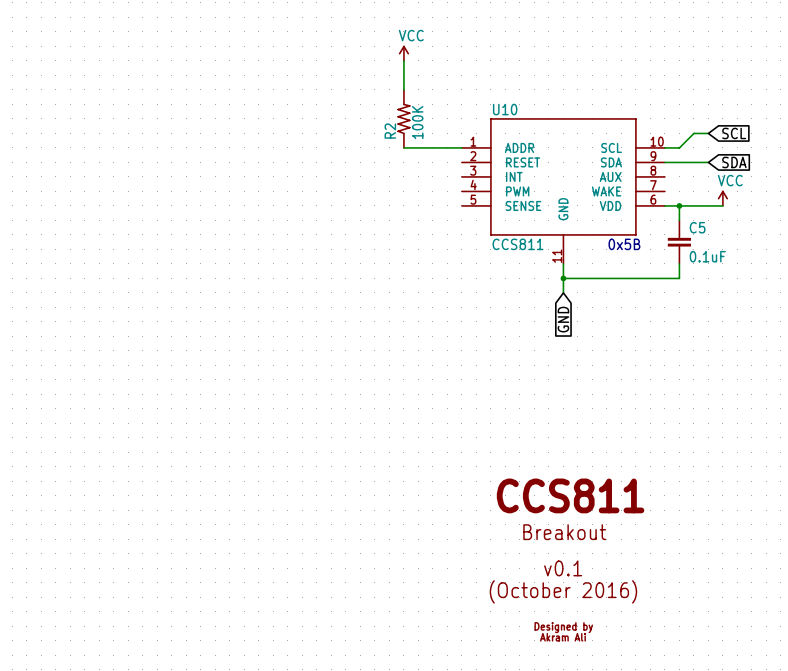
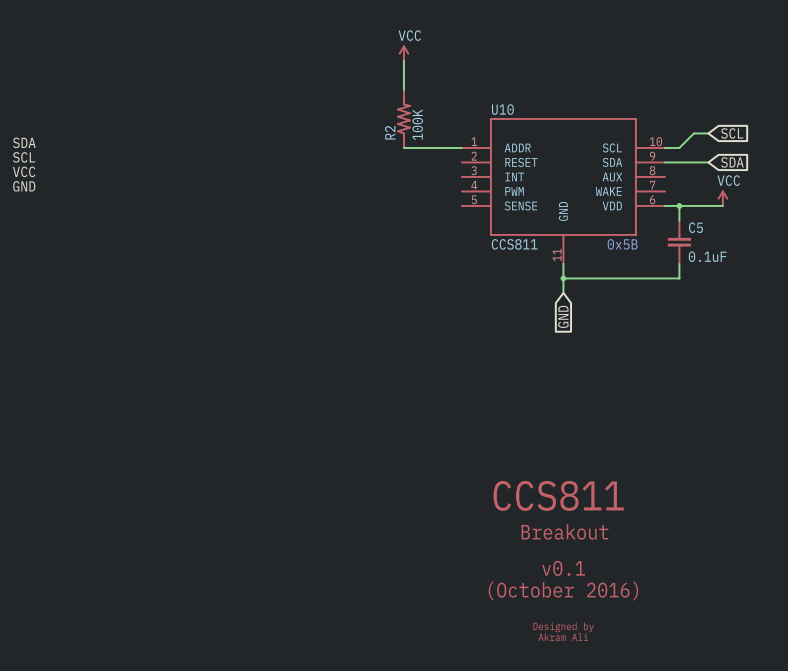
label: none -> SDA (24, 142)
label: none -> SCL (24, 157)
label: none -> VCC (24, 171)
label: none -> GND (24, 186)

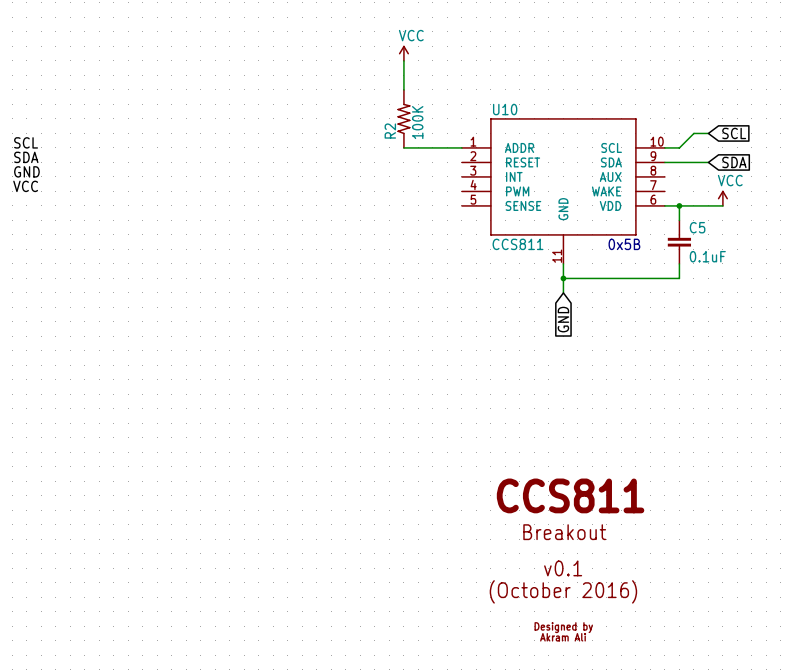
label: SDA (24, 142) -> SCL (26, 142)
label: SCL (24, 157) -> SDA (26, 157)
label: VCC (24, 171) -> GND (26, 171)
label: GND (24, 186) -> VCC (25, 186)

